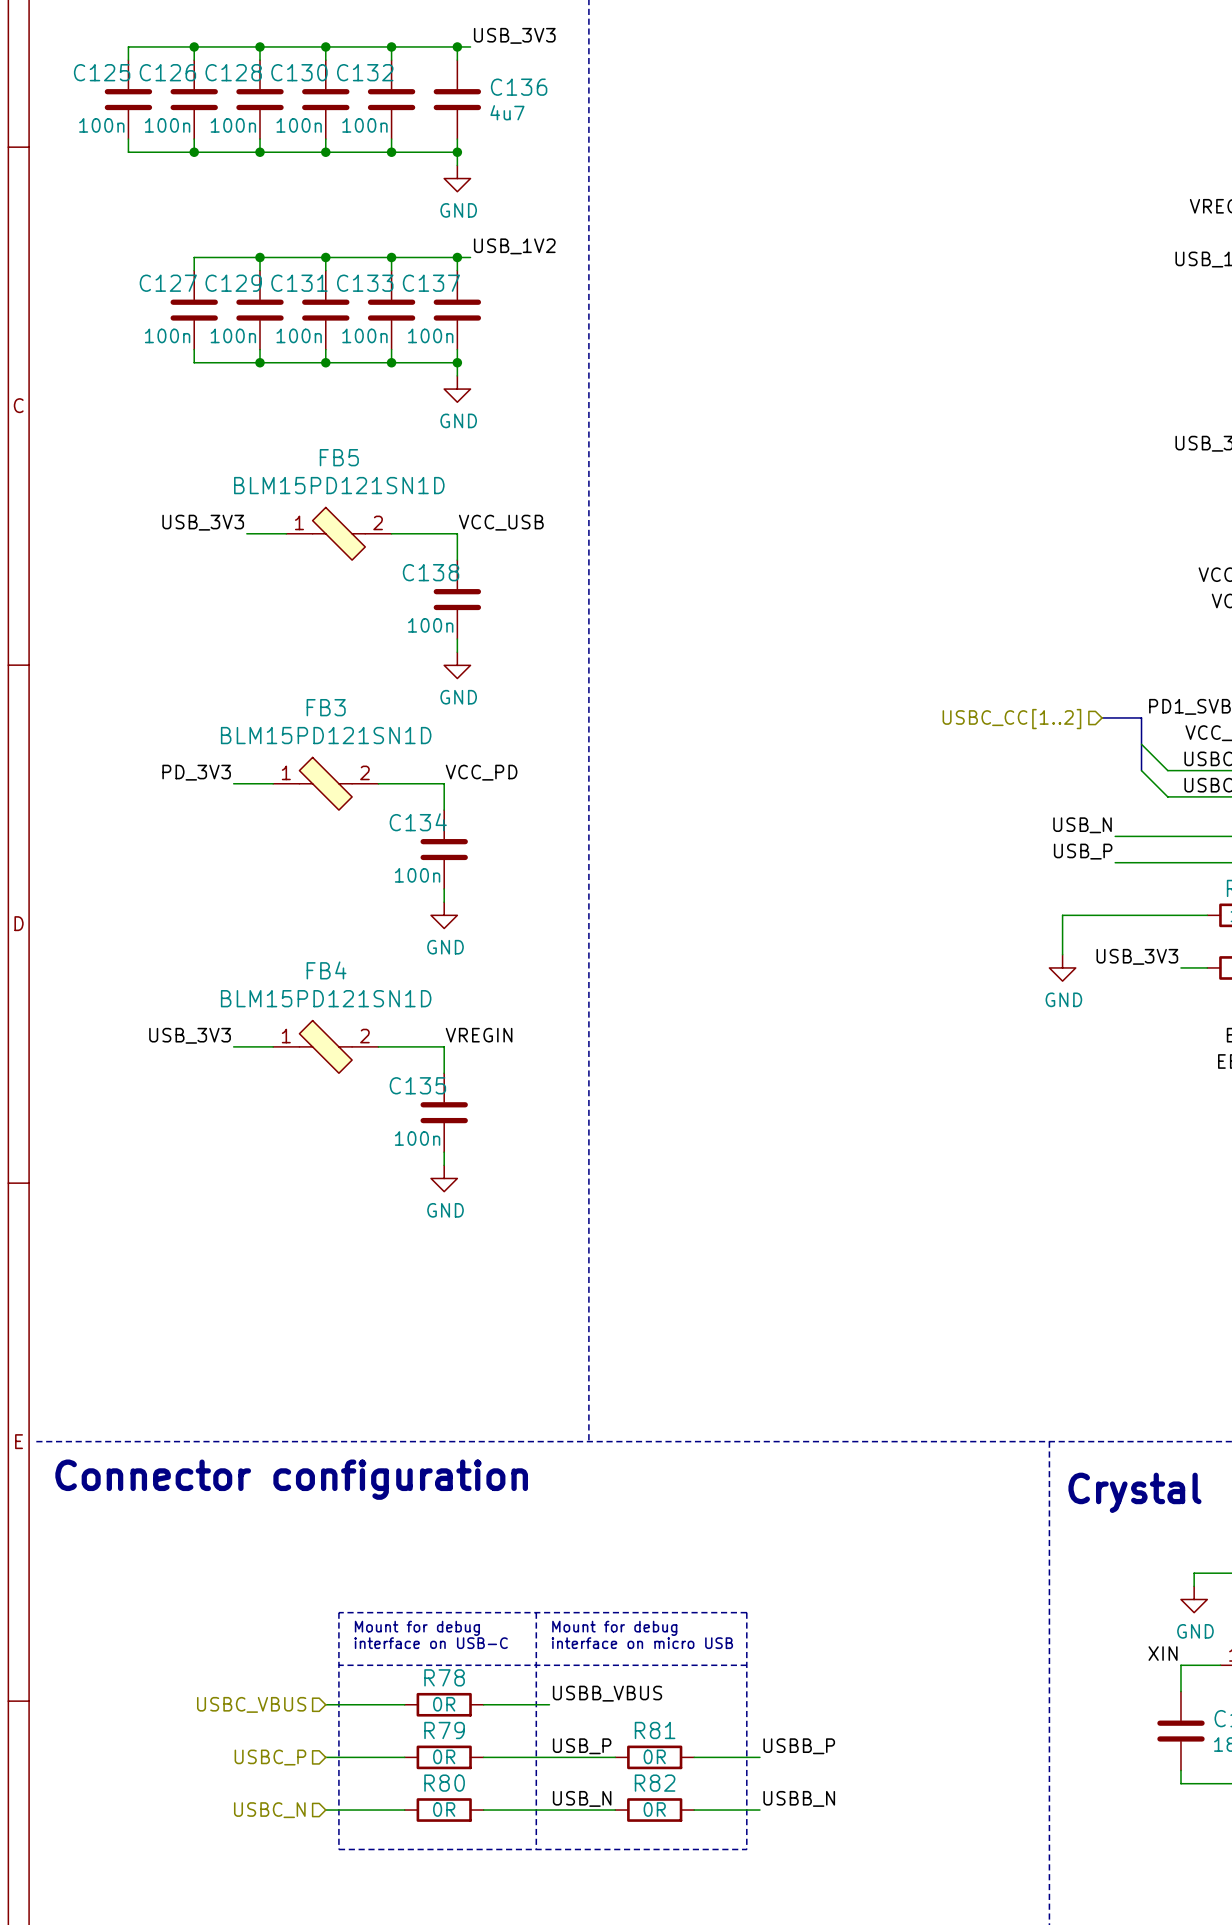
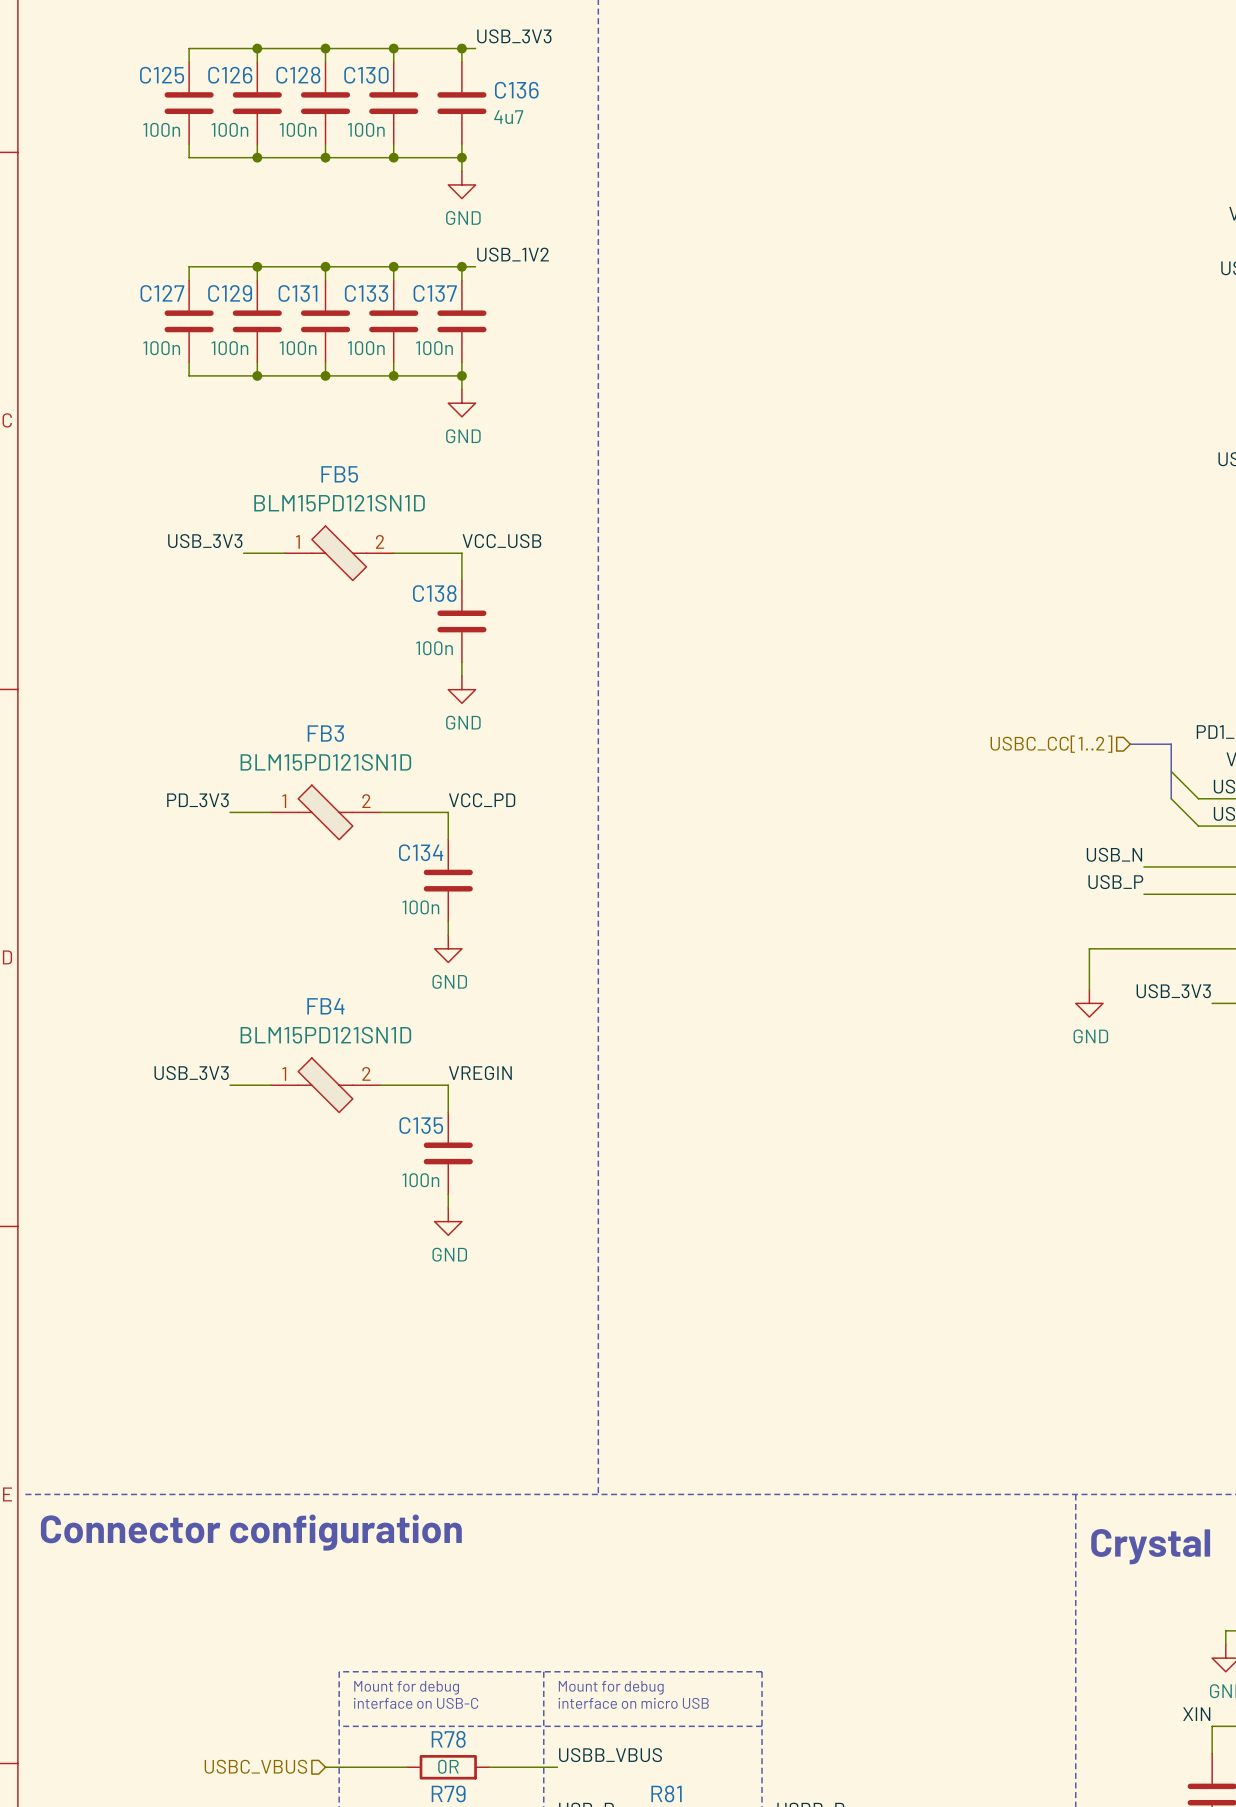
wire: (194, 46) (128, 46) (128, 60) -> none
junction: (194, 46) -> none
C126 name: C126 (167, 72) -> C125 (162, 75)
C128 name: C128 (233, 72) -> C126 (230, 75)
C130 name: C130 (299, 72) -> C128 (298, 75)
C132 name: C132 (365, 72) -> C130 (366, 75)
C125: (128, 99) -> none
wire: (128, 139) (128, 152) (194, 152) -> none
junction: (194, 152) -> none

